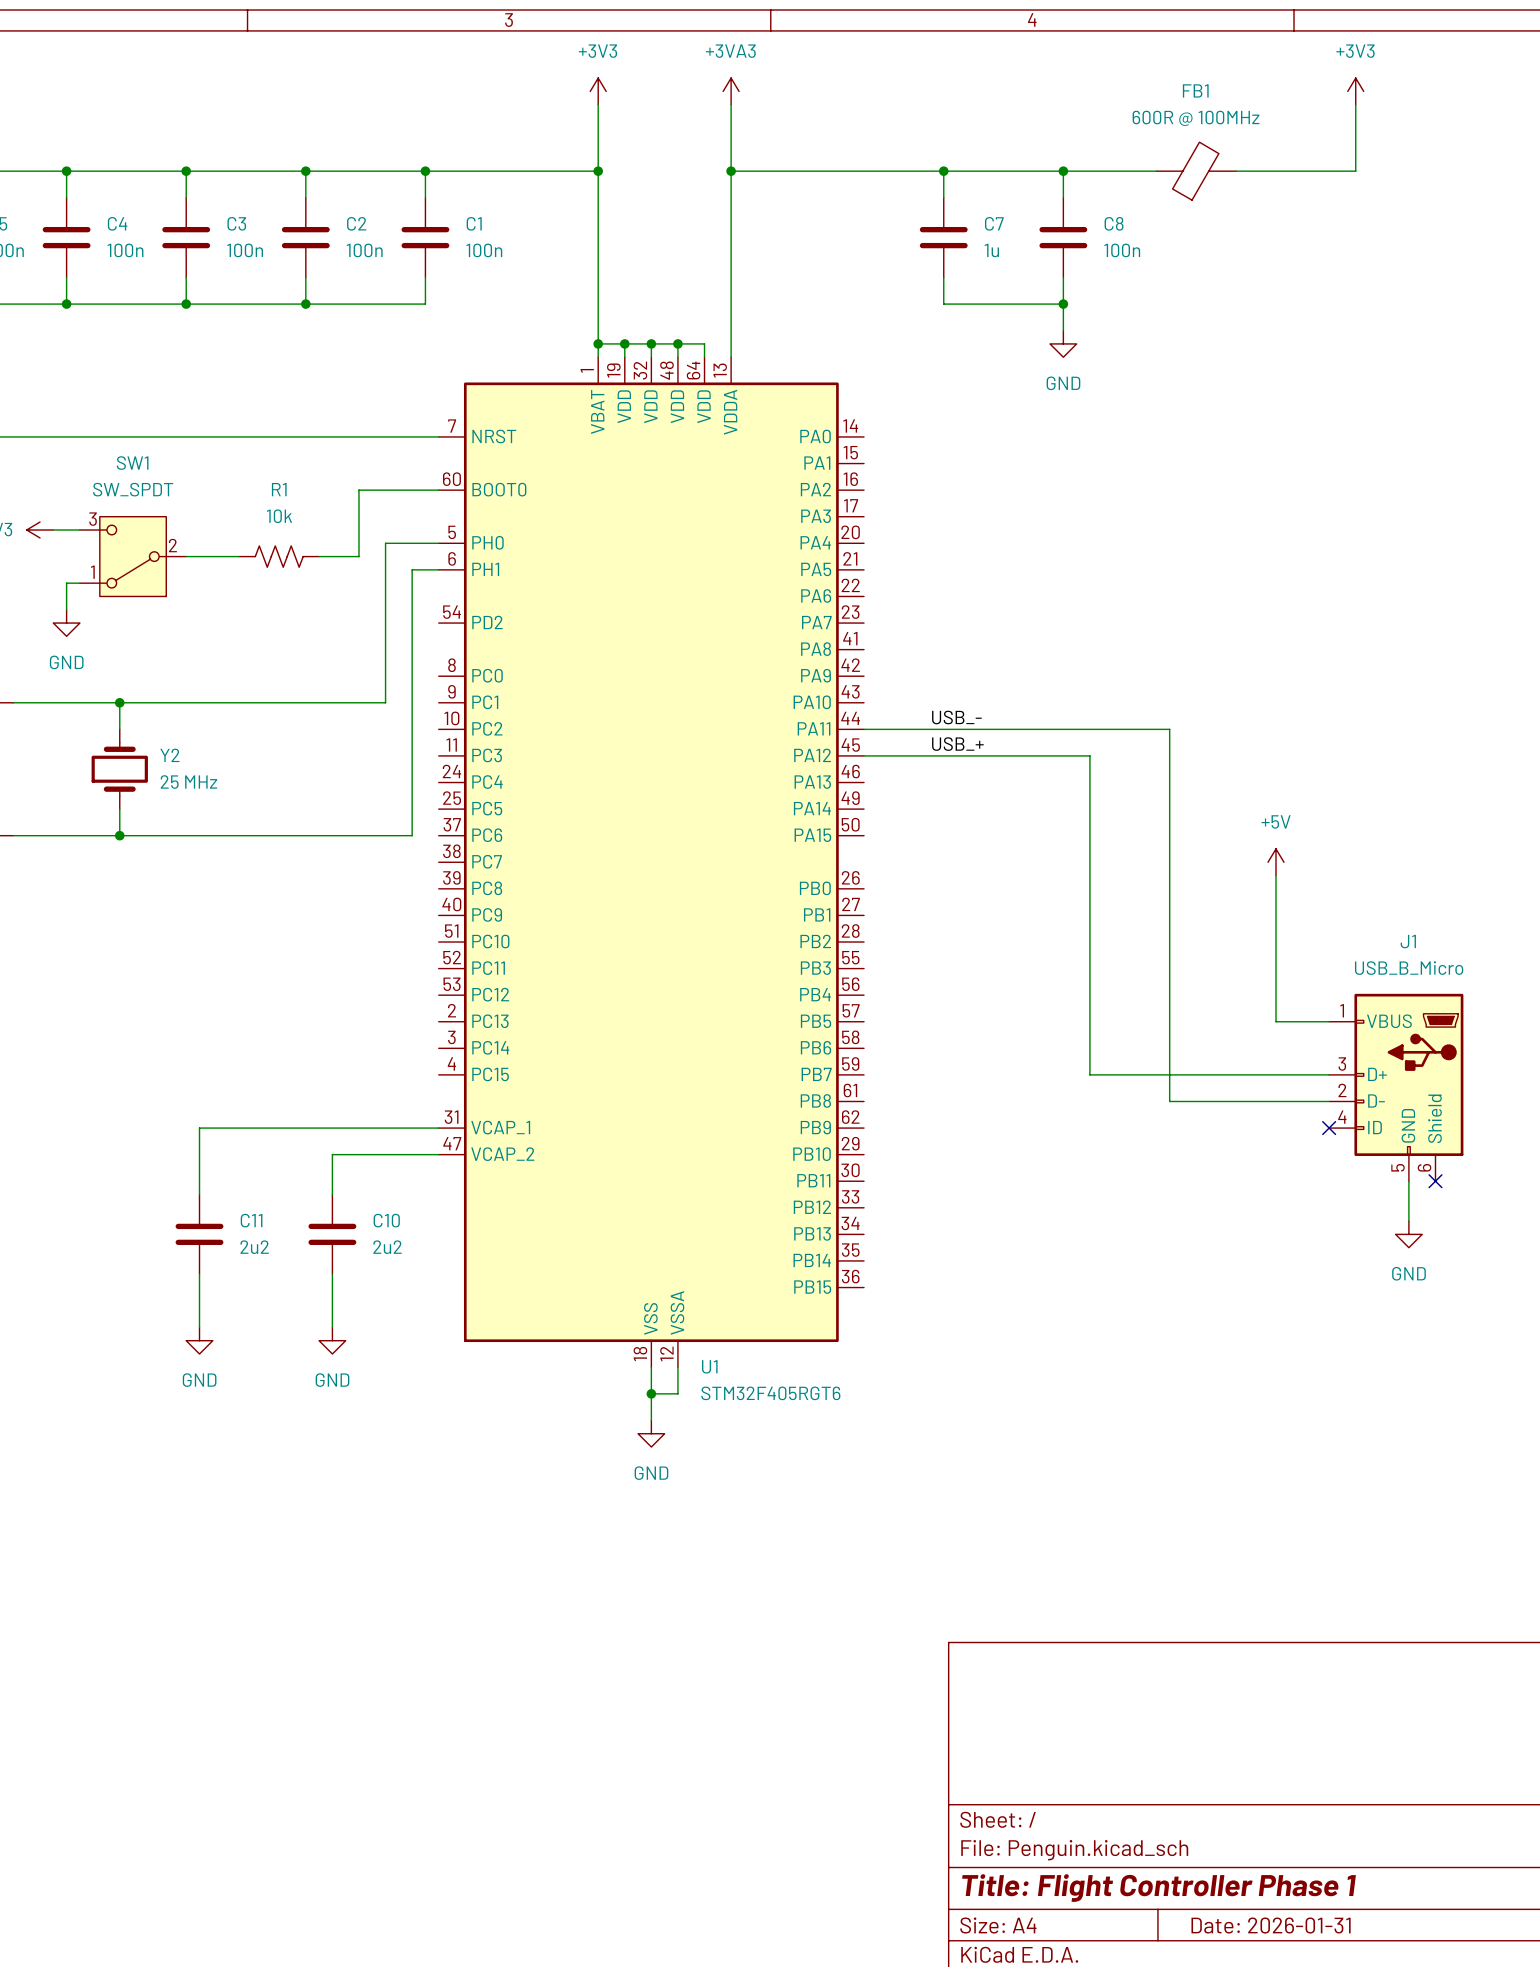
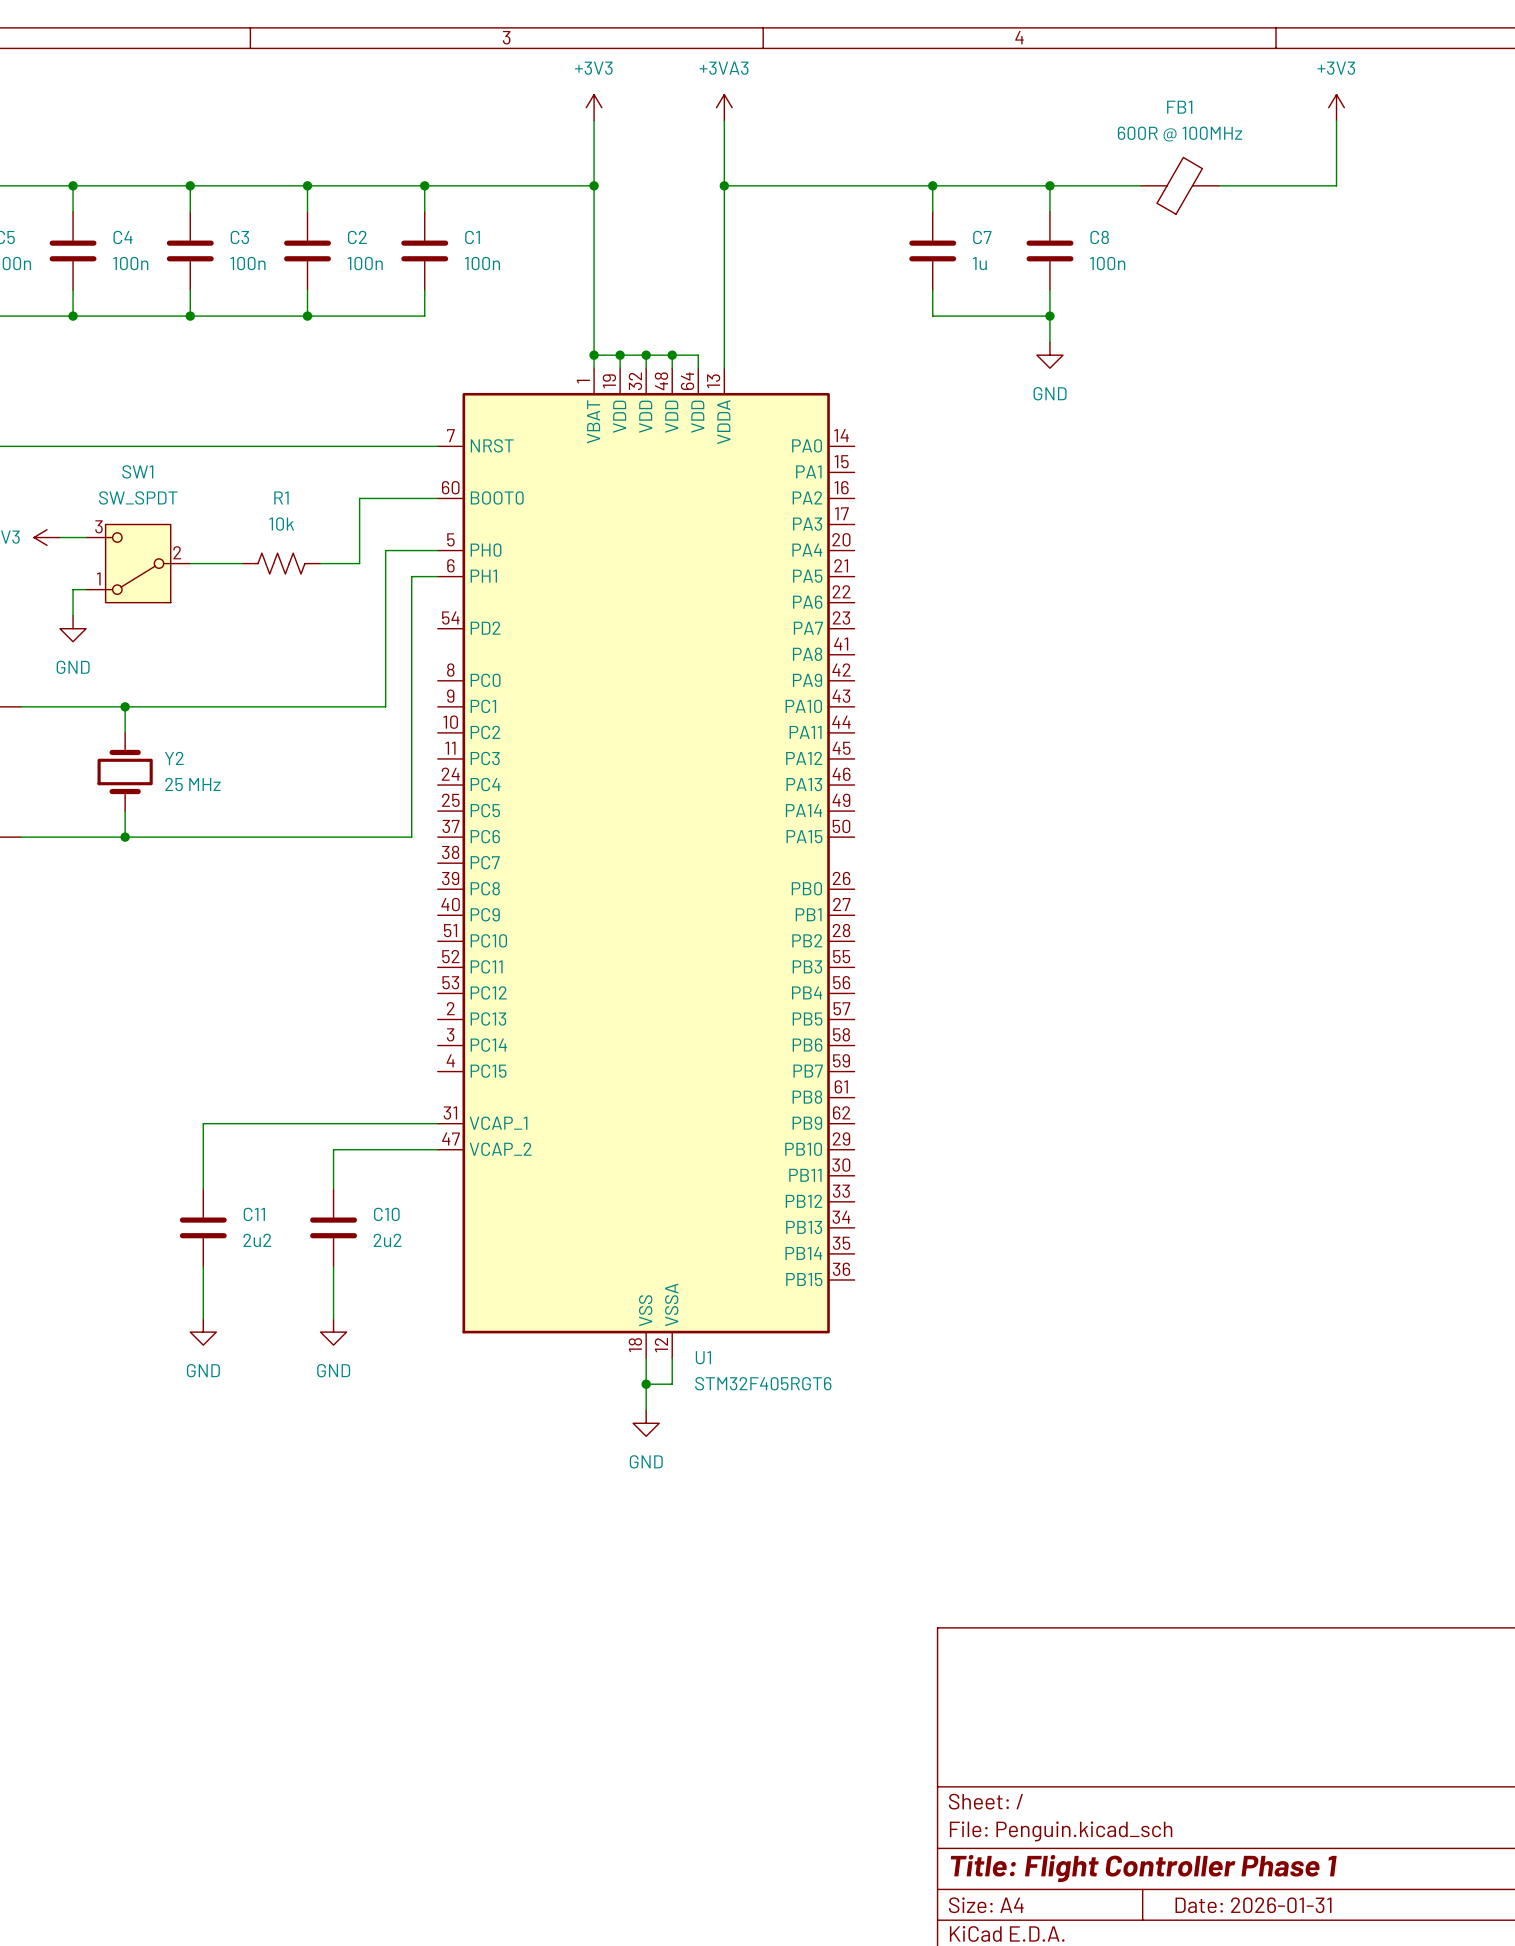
label: USB_- (956, 717) -> none
wire: (864, 729) (1169, 729) (1169, 1101) (1329, 1101) -> none
label: USB_+ (957, 744) -> none
wire: (864, 755) (1089, 755) (1089, 1074) (1329, 1074) -> none
power symbol: +5V (1276, 862) -> none
wire: (1276, 875) (1276, 1021) (1329, 1021) -> none
J1: USB_B_Micro (1396, 1087) -> none
no-connect mark: (1329, 1128) -> none
wire: (1408, 1181) (1408, 1221) -> none
no-connect mark: (1435, 1181) -> none
power symbol: GND (1408, 1234) -> none

